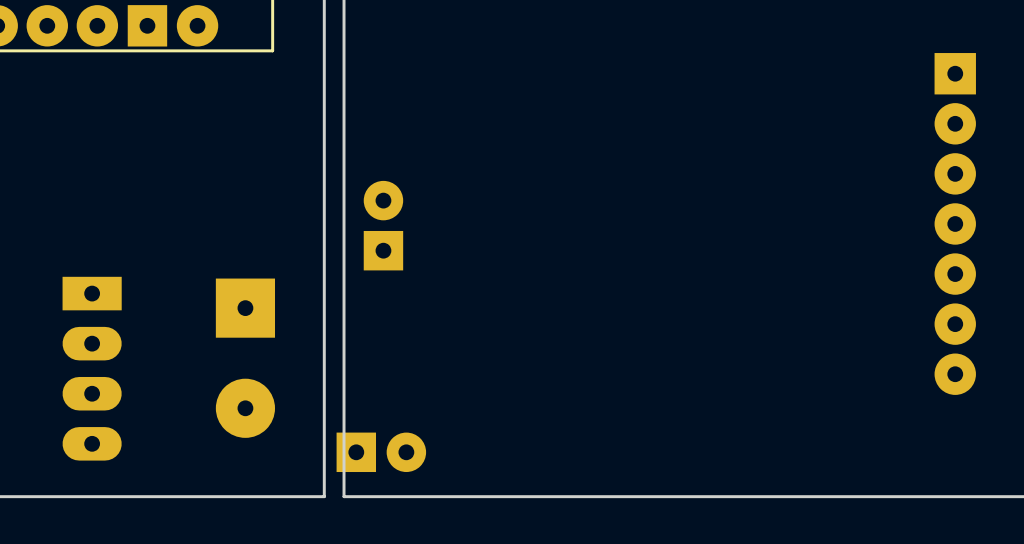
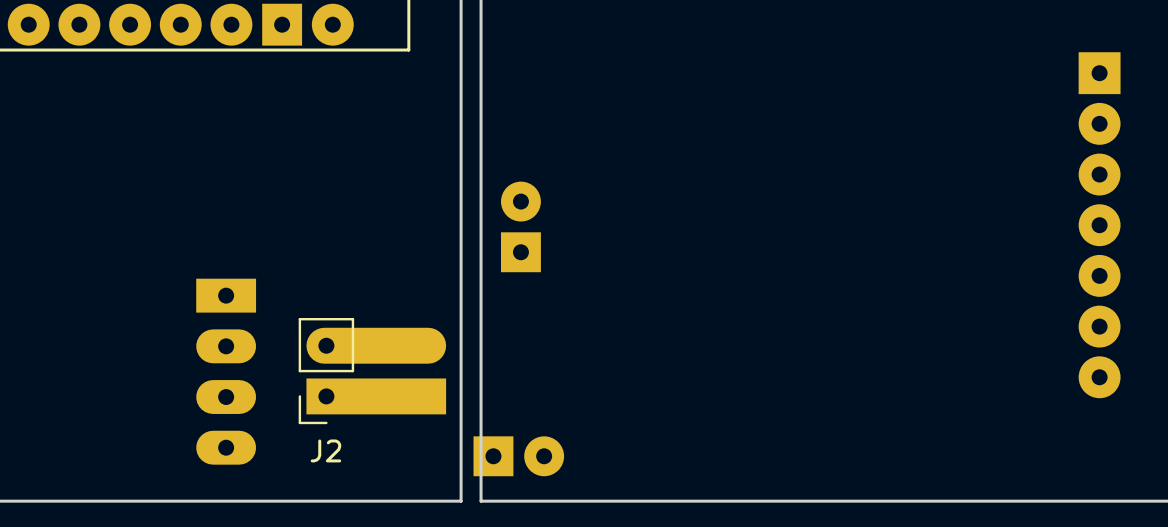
part: (245, 358) -> none
J2: none -> (372, 371)

